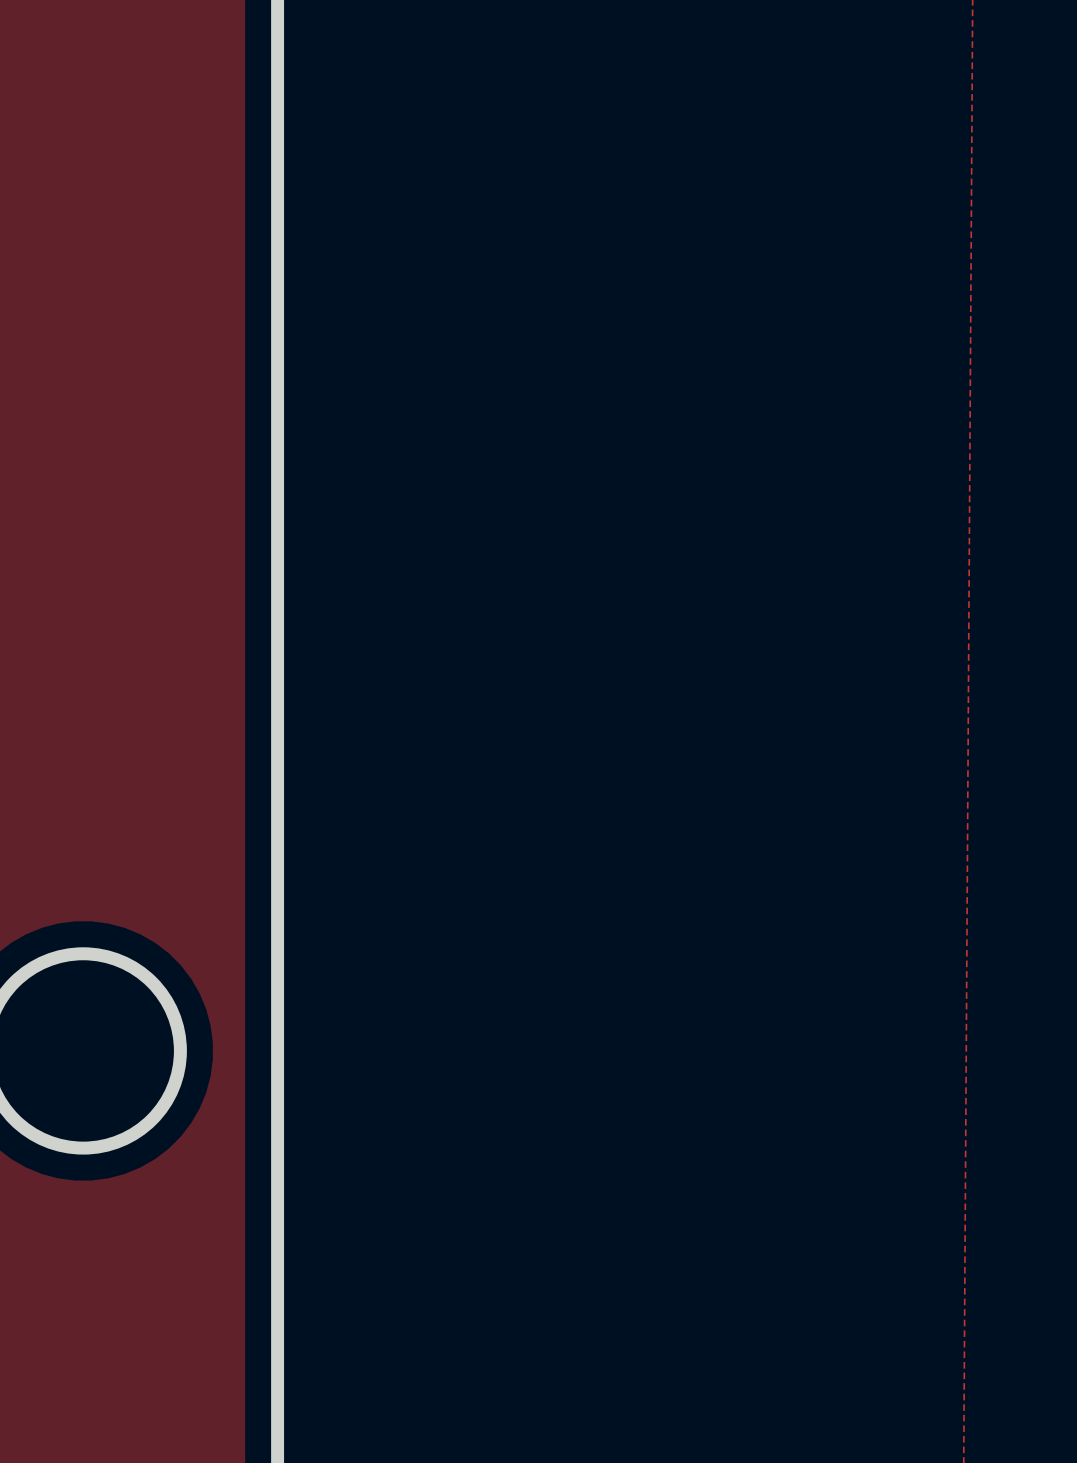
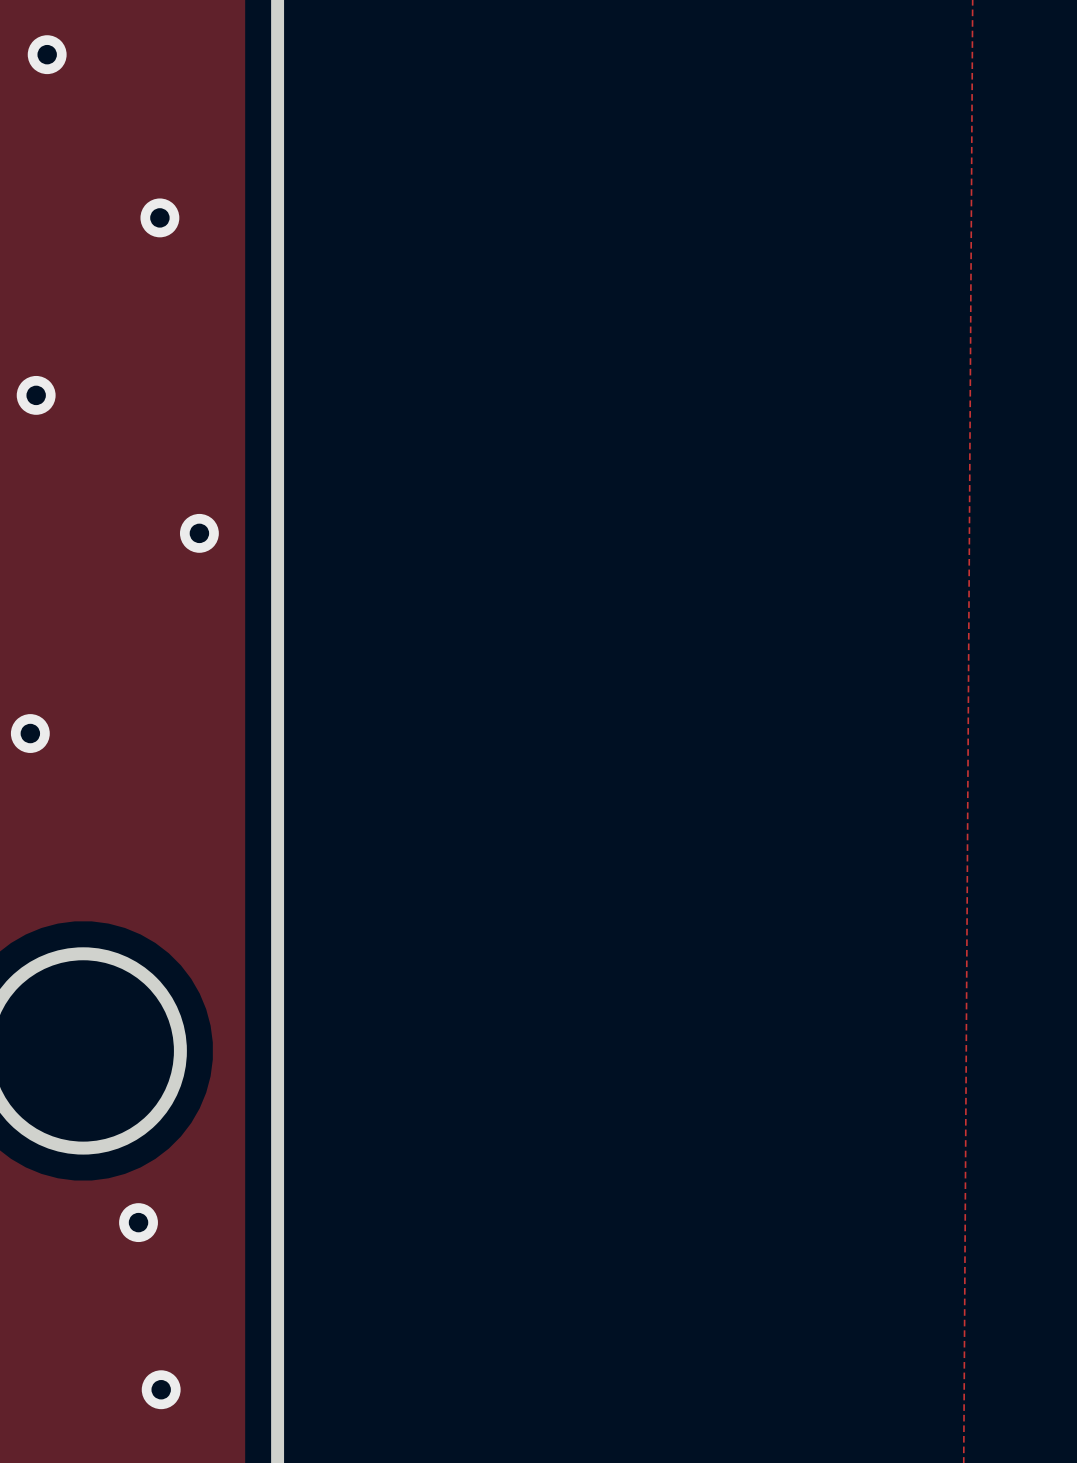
via: none -> (47, 54)
via: none -> (159, 217)
via: none -> (36, 395)
via: none -> (199, 533)
via: none -> (30, 733)
via: none -> (138, 1222)
via: none -> (161, 1389)

